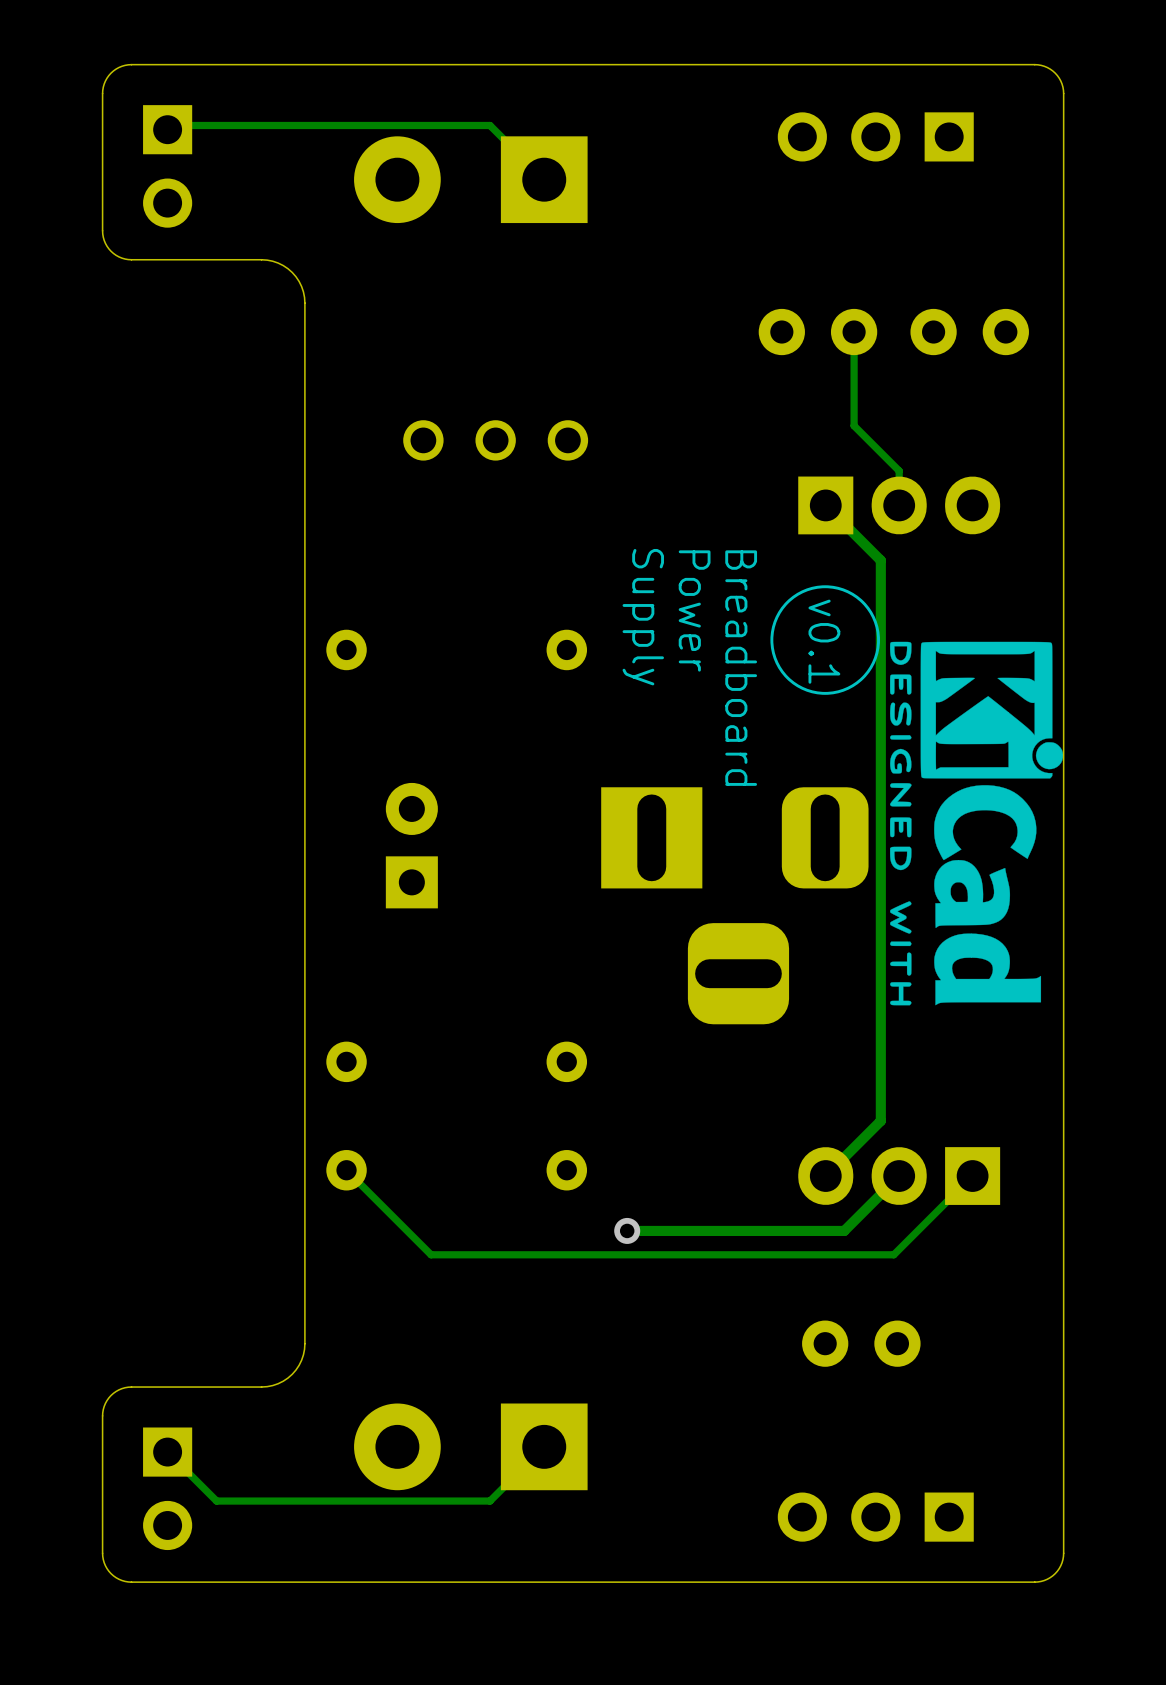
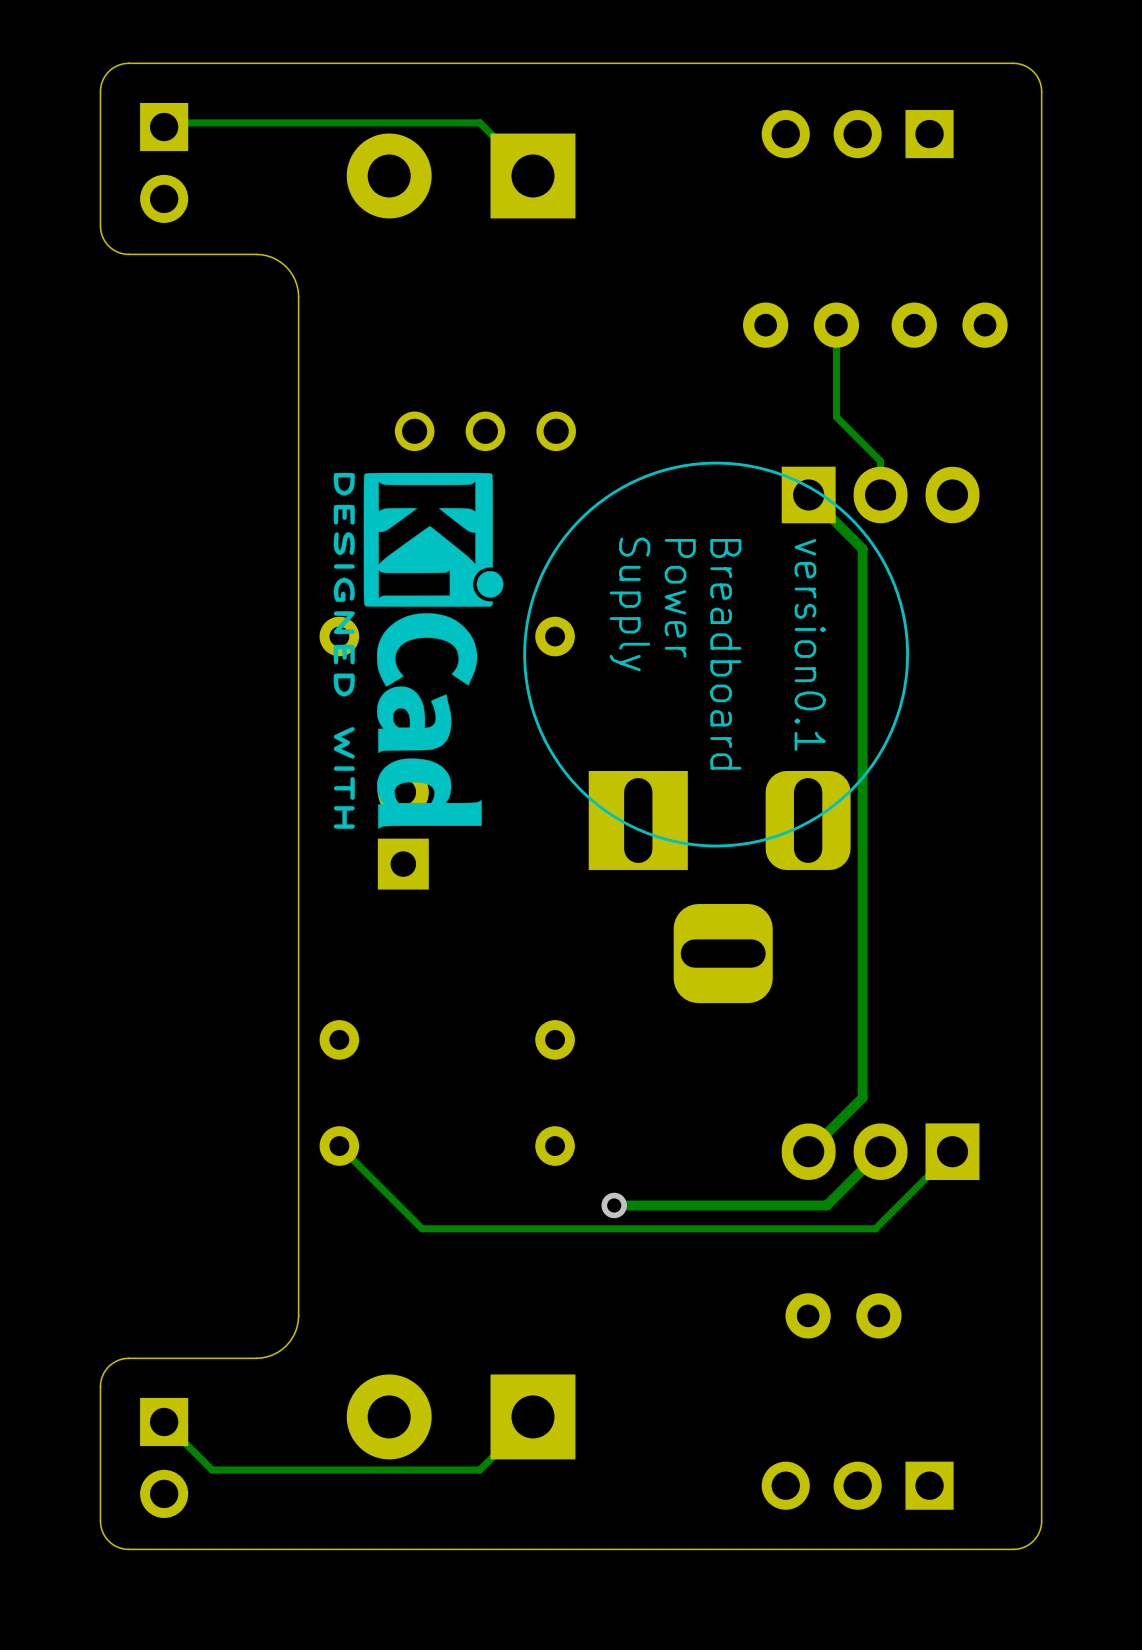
drawing: none -> [523, 461, 909, 848]
drawing: [770, 585, 880, 695] -> none
text: v0.1 (824, 641) -> none
text: none -> version0.1 (810, 644)
drawing position: (976, 823) -> (418, 650)

